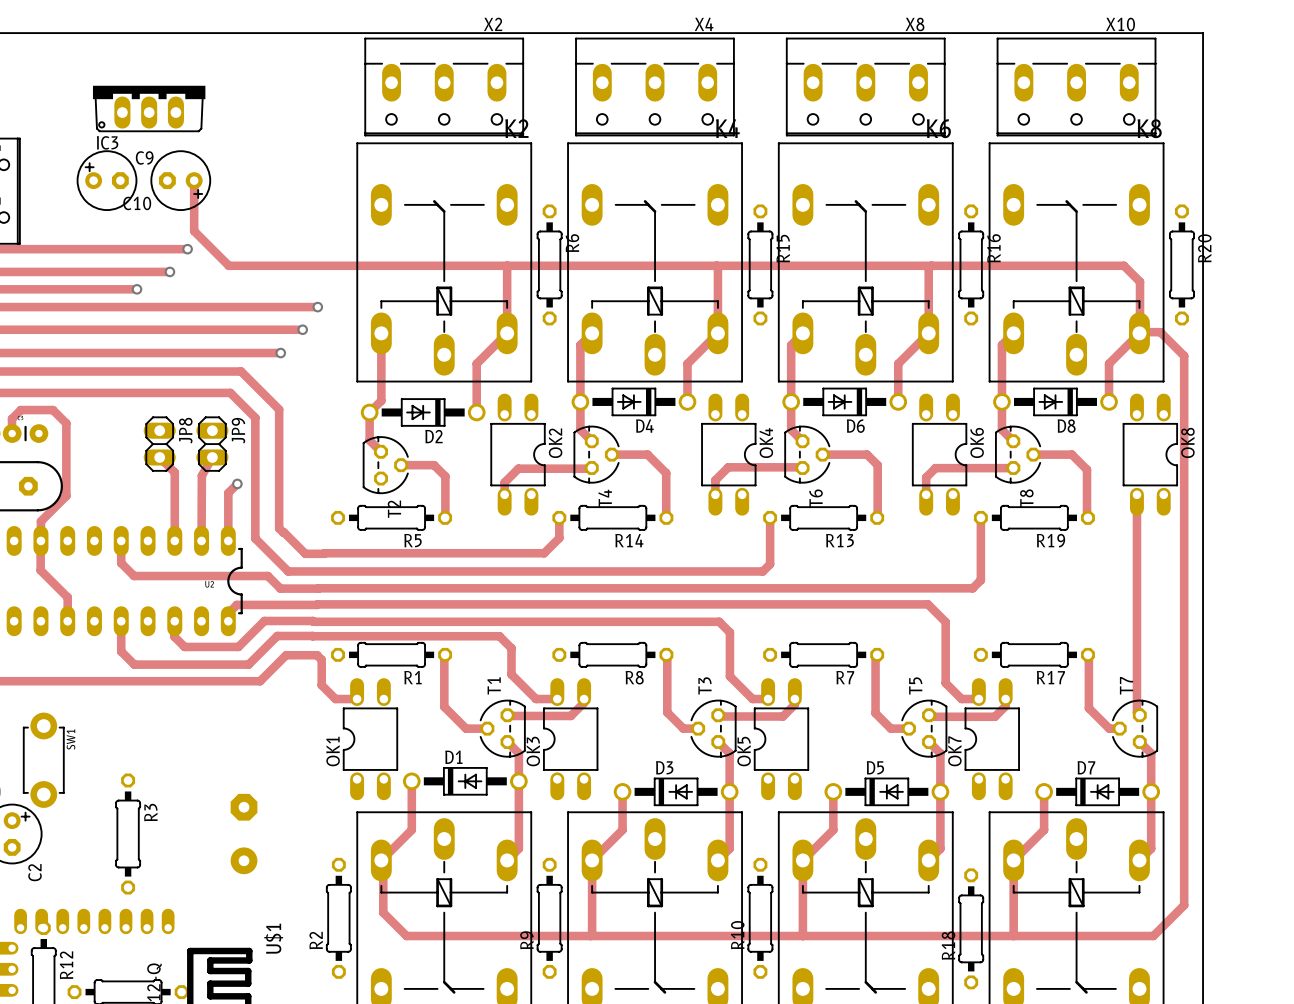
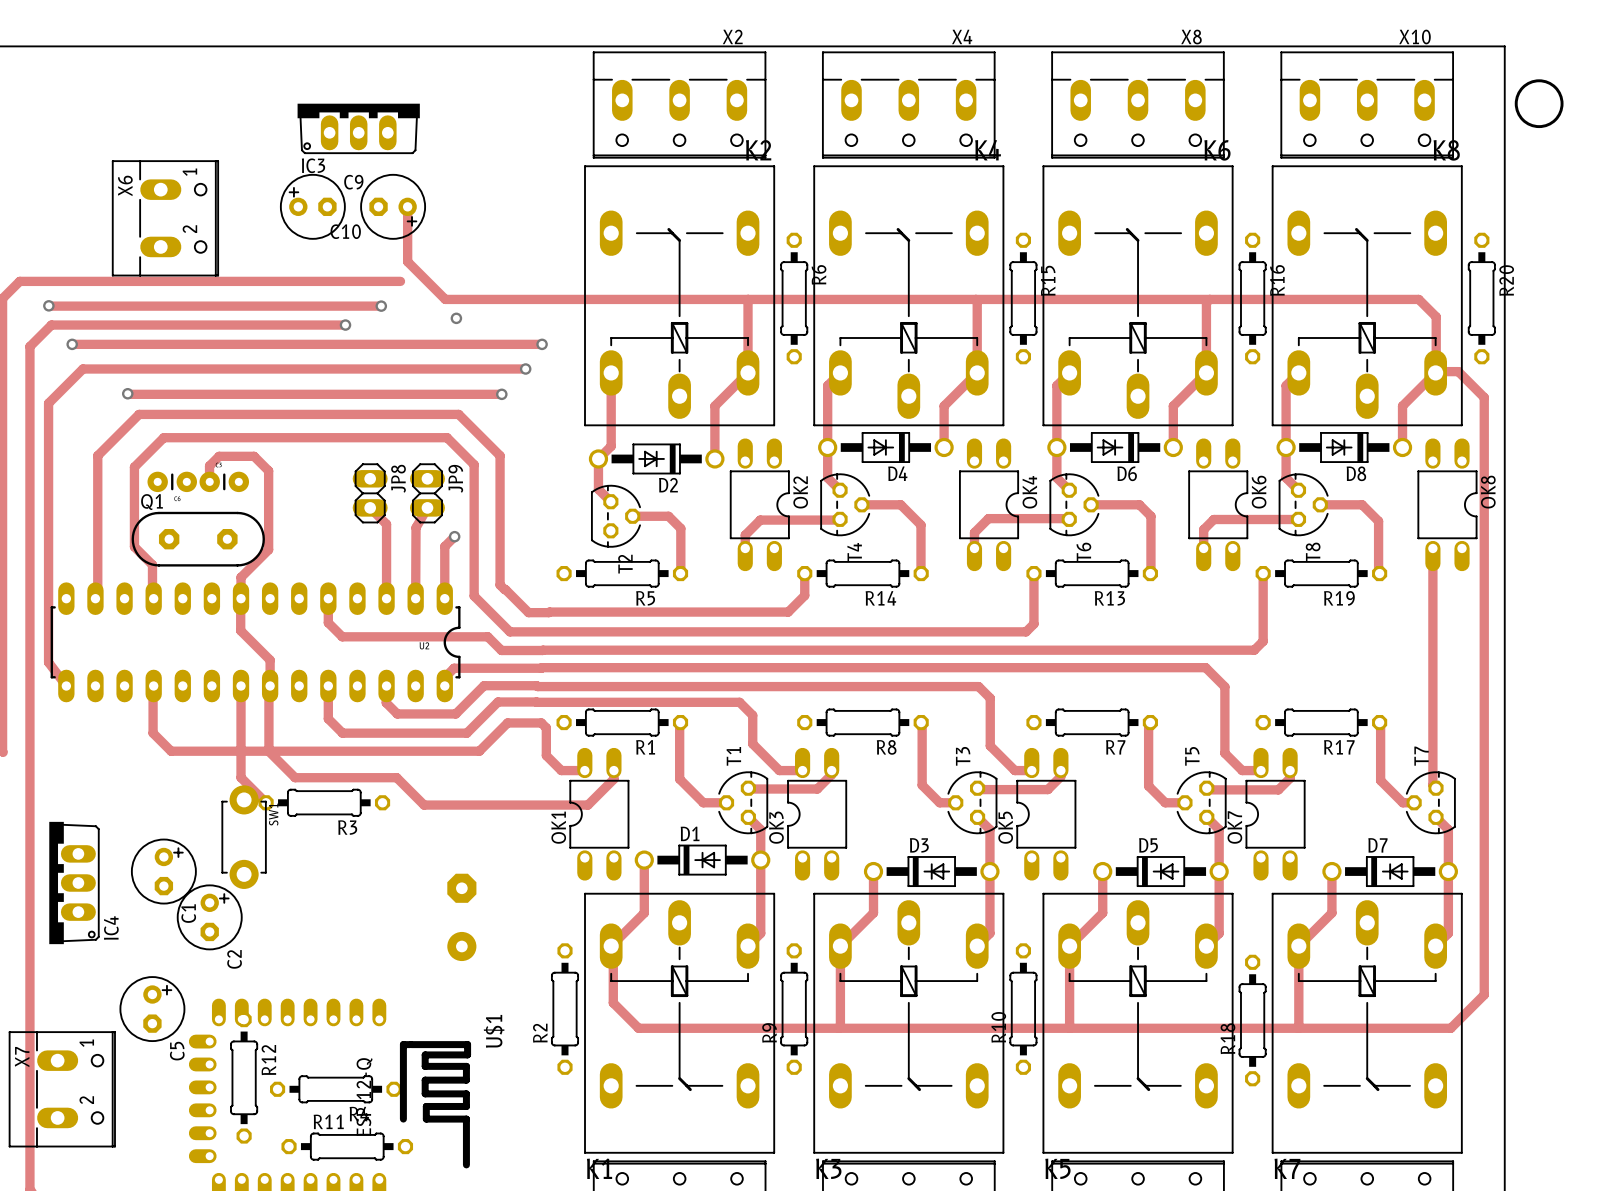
round board edge: none -> [1514, 79, 1564, 129]
via position: (187, 249) -> (456, 318)
track: none -> (241, 686) (241, 777) (266, 802)
track: none -> (270, 686) (268, 751) (295, 777) (396, 777) (424, 805) (587, 805) (613, 779) (613, 770)
R3 rotation: 0° (128, 834) -> 90° clockwise (324, 802)
R3 position: (128, 834) -> (324, 802)

